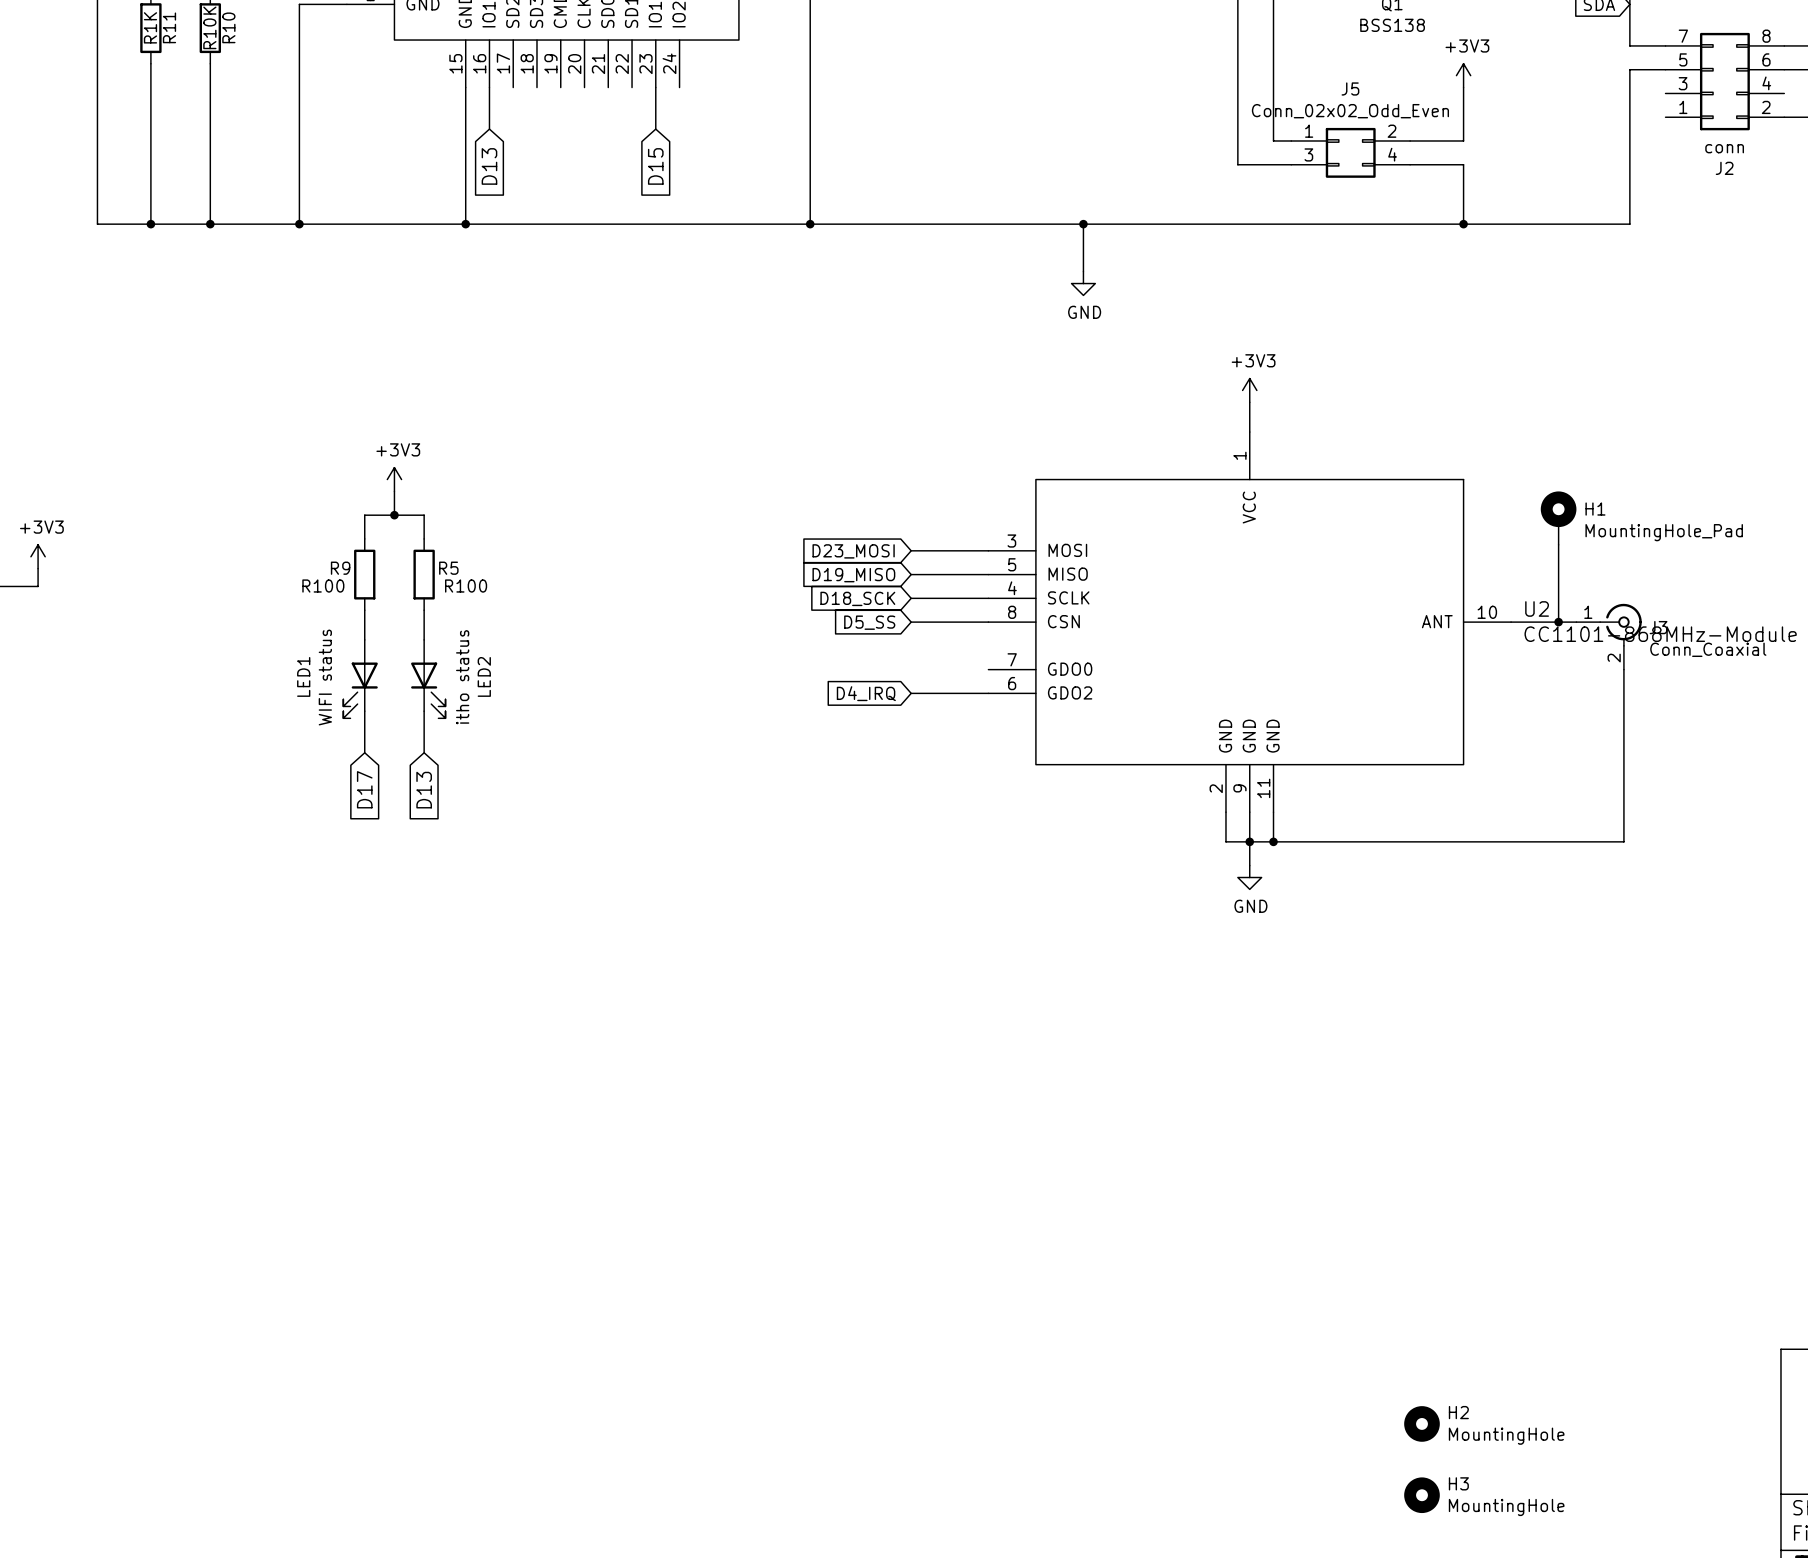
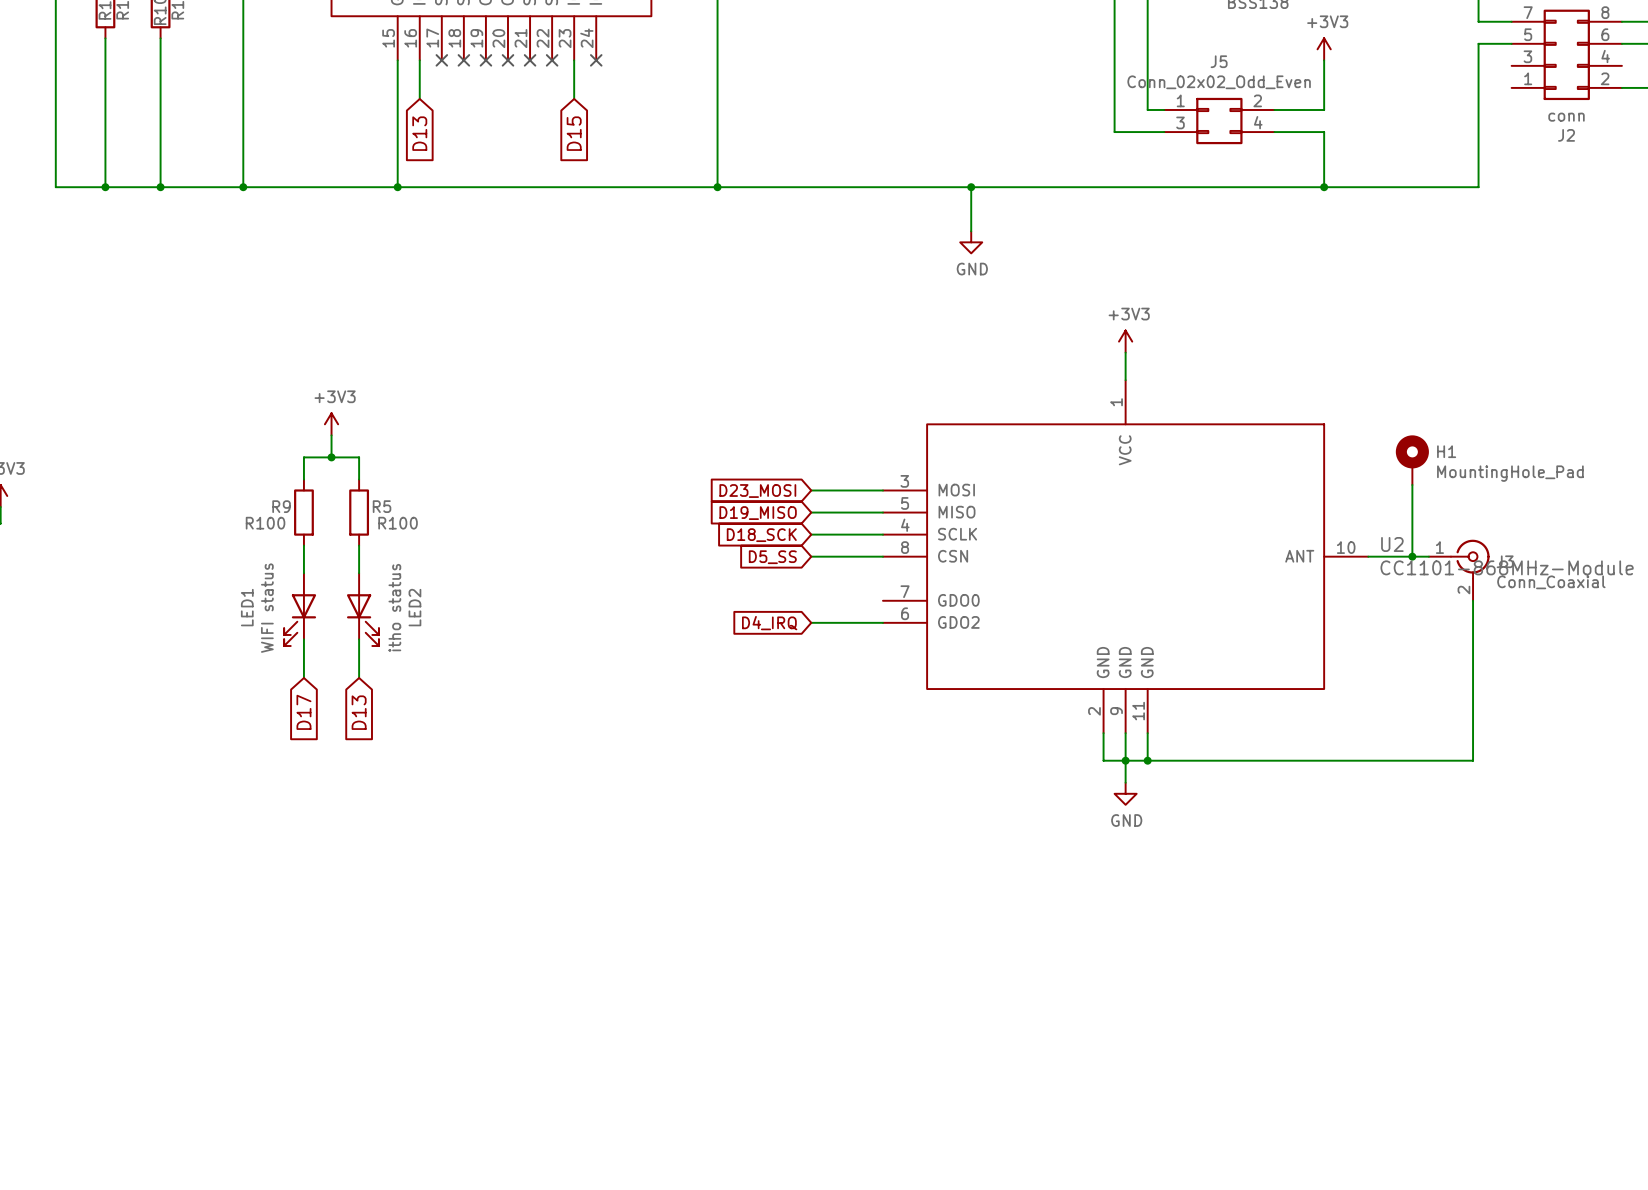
no-connect mark: none -> (441, 60)
no-connect mark: none -> (463, 60)
no-connect mark: none -> (485, 60)
no-connect mark: none -> (507, 60)
no-connect mark: none -> (530, 60)
no-connect mark: none -> (552, 60)
no-connect mark: none -> (596, 60)

